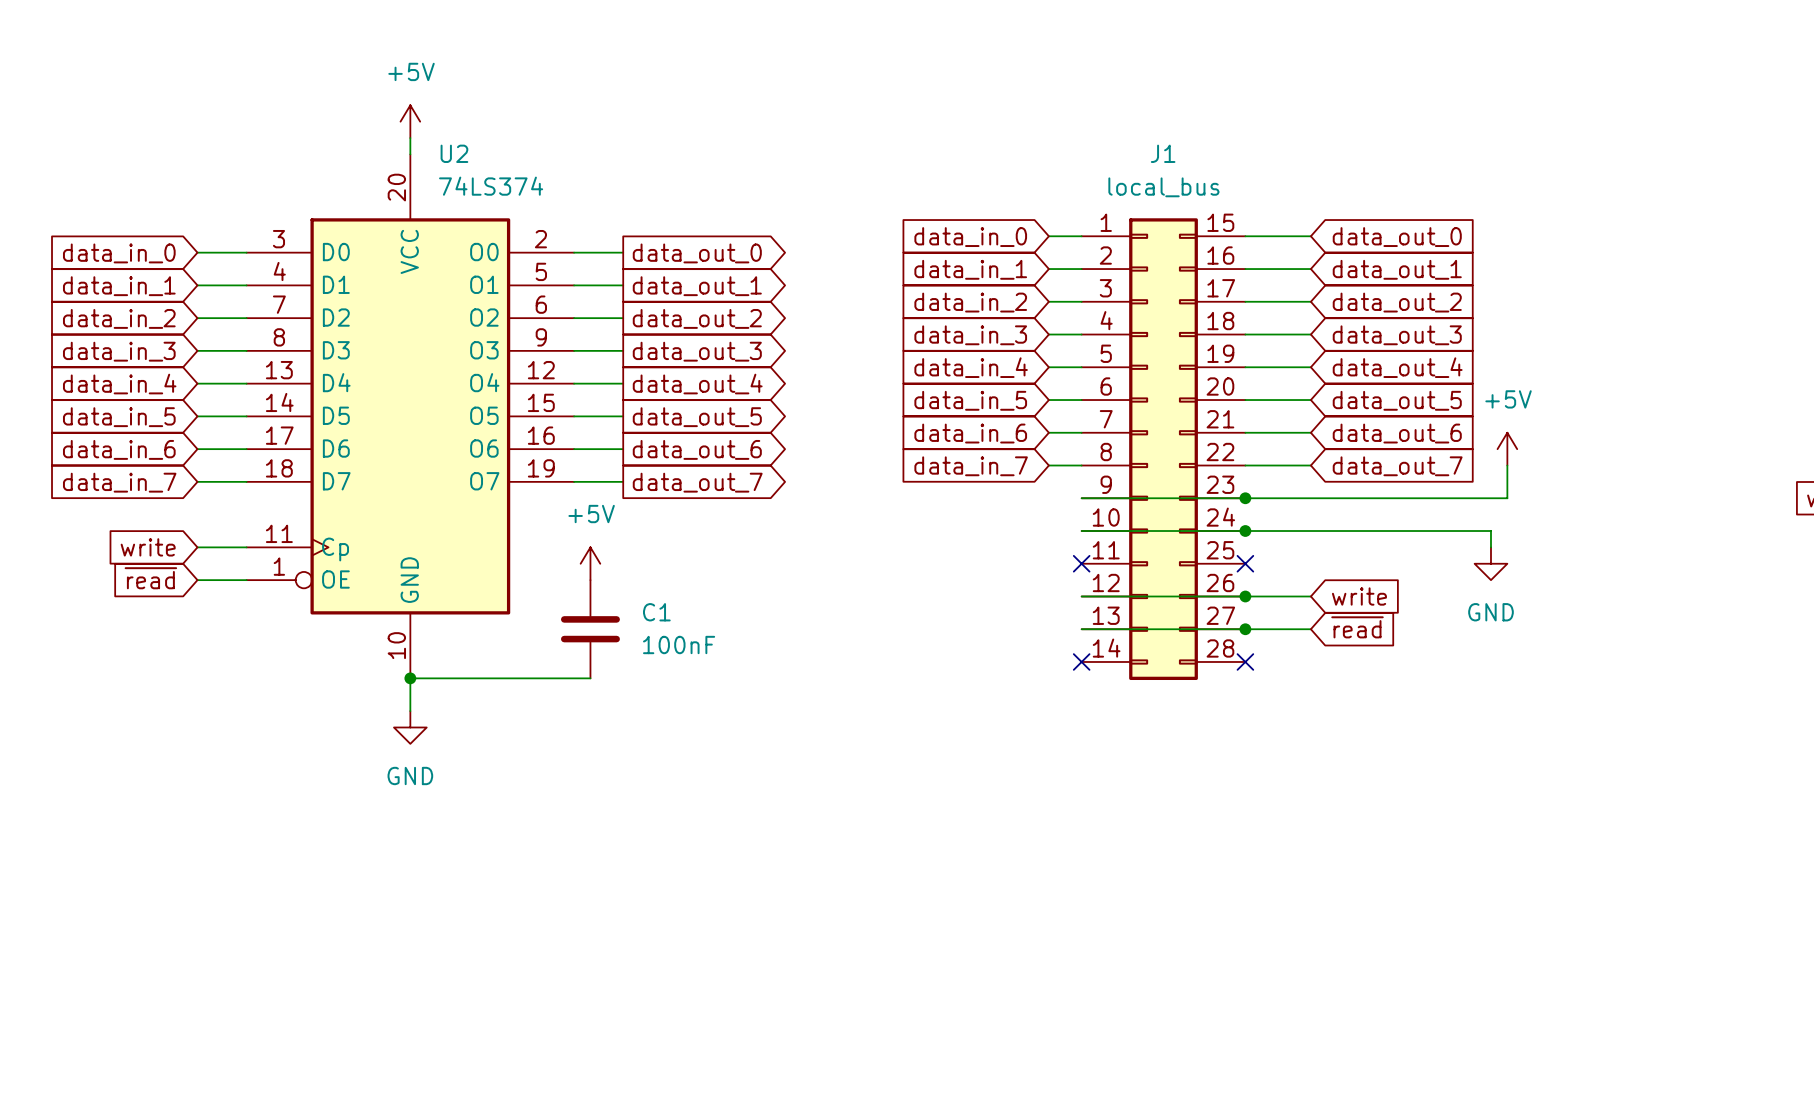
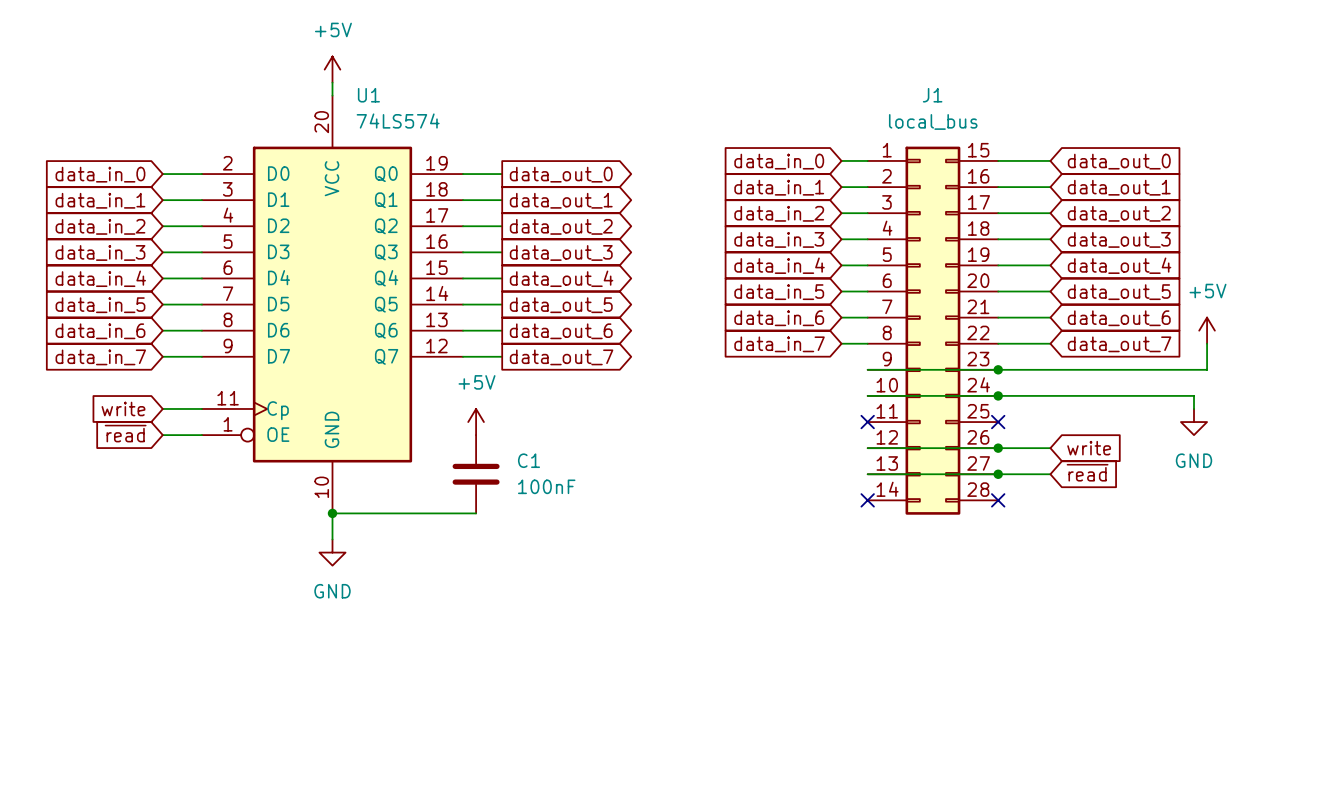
U2 name: U2 (454, 153) -> U1 (368, 95)
U2 symbol: [246, 154, 575, 679] -> [201, 95, 464, 514]
U2 value: 74LS374 (491, 186) -> 74LS574 (398, 121)

